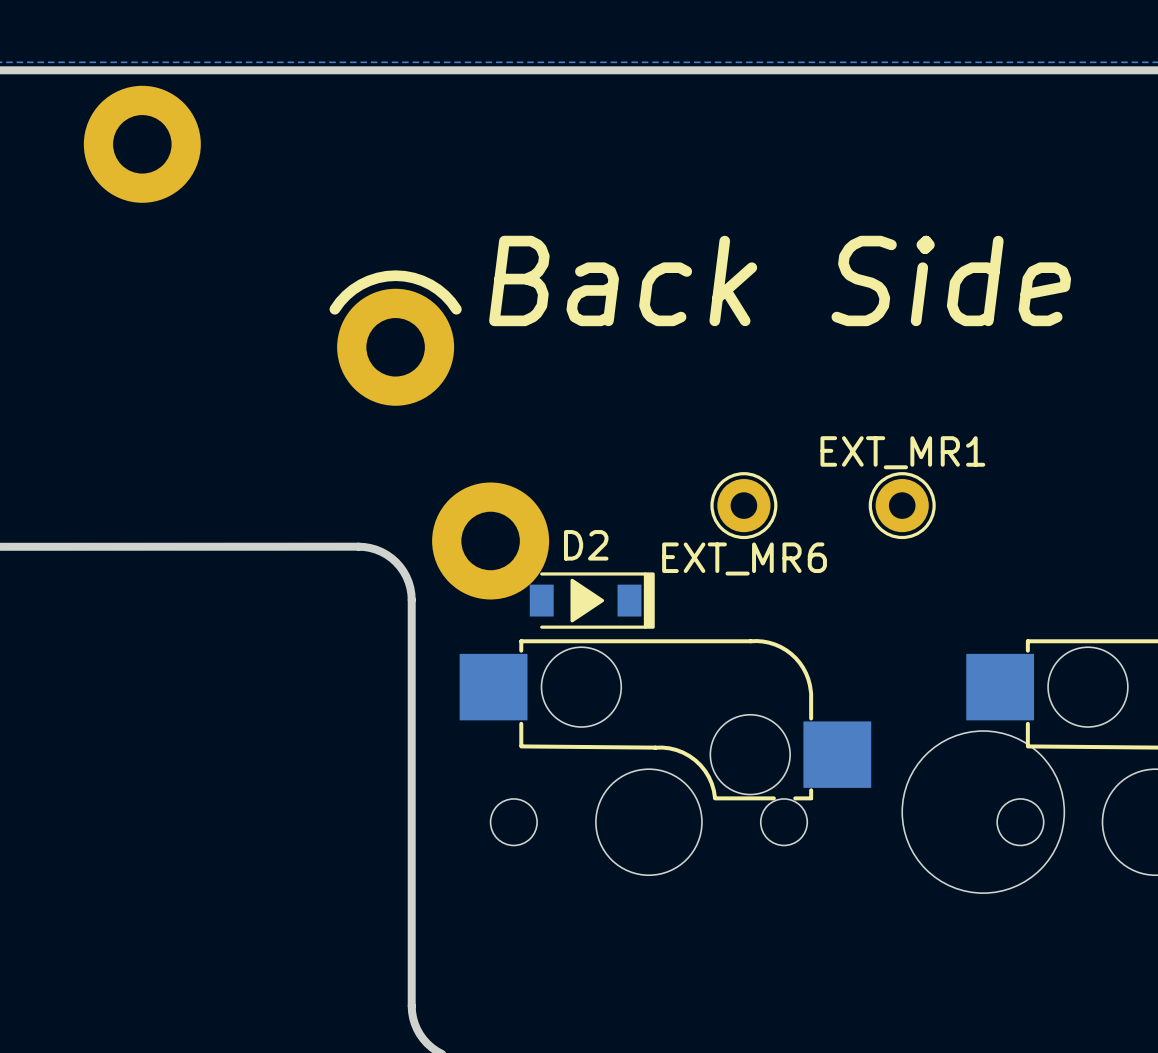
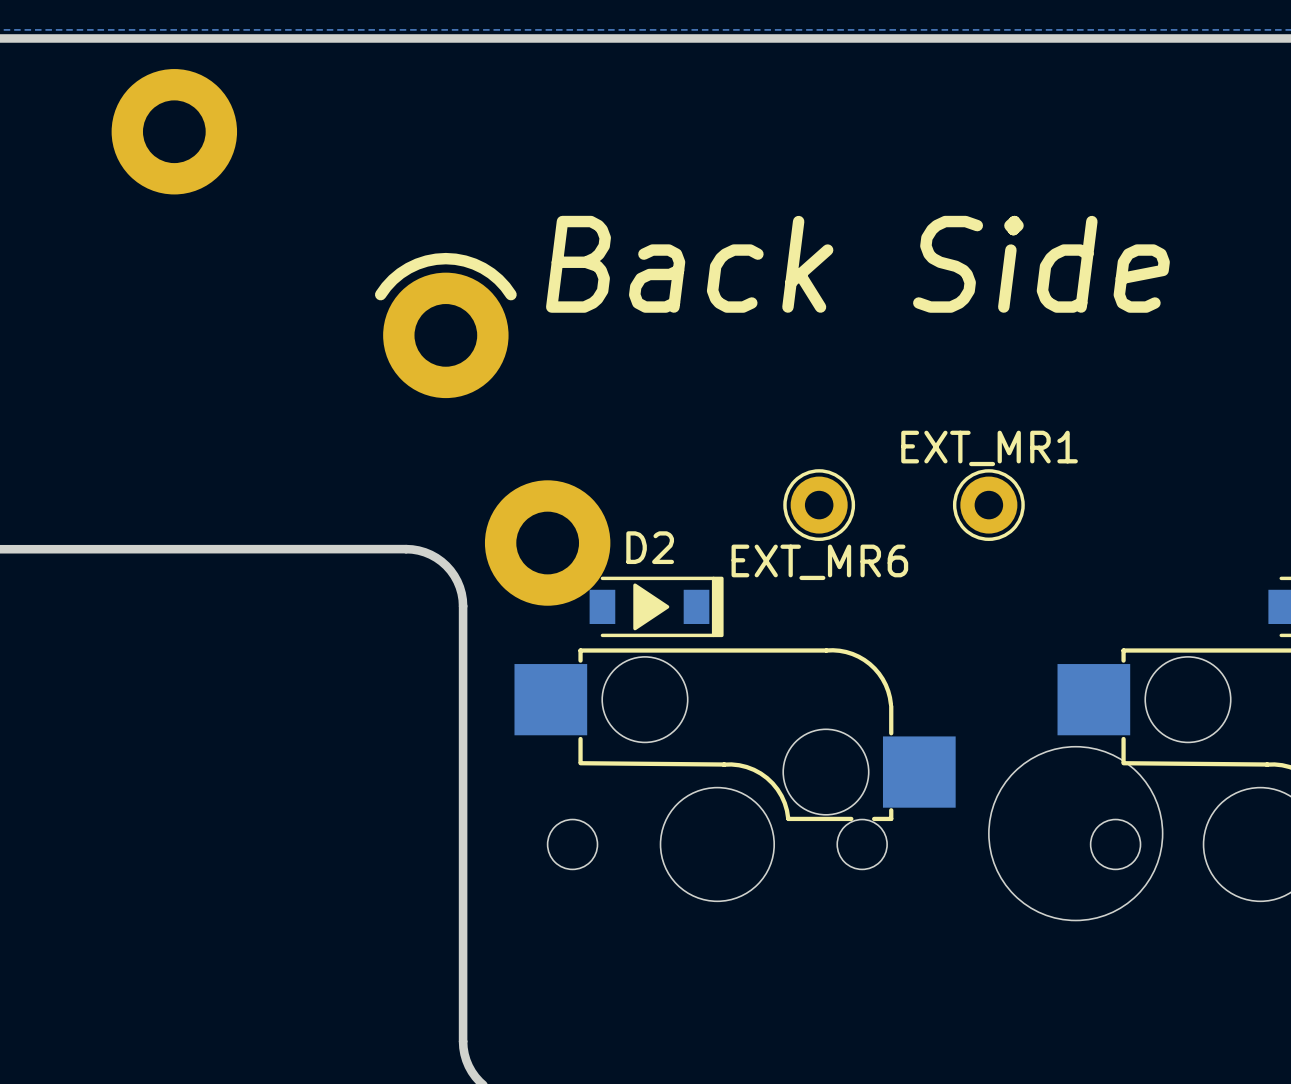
part position: (142, 144) -> (174, 131)

